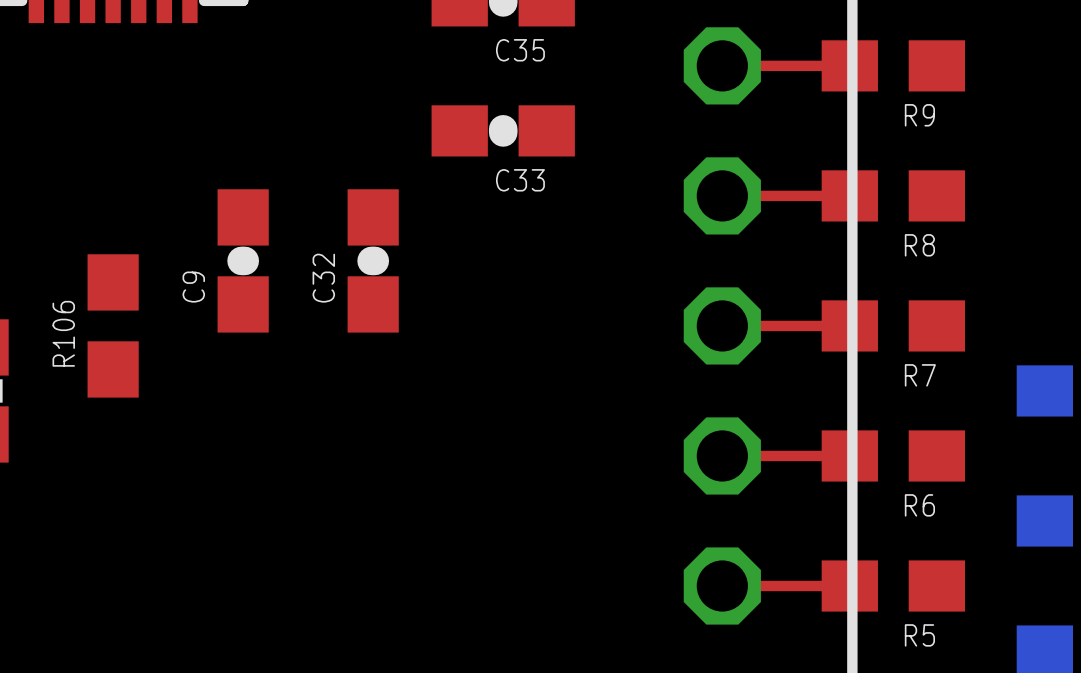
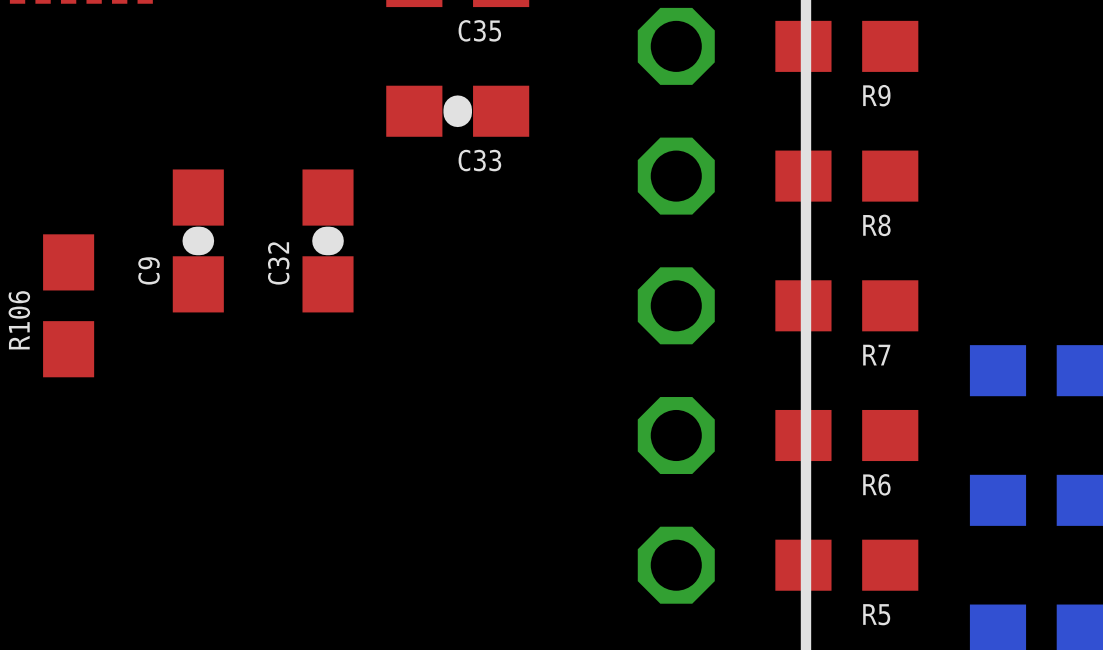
top track: (722, 65) (849, 65) -> none
top track: (722, 195) (849, 195) -> none
top track: (722, 325) (849, 325) -> none
top track: (722, 455) (849, 455) -> none
top track: (722, 586) (849, 586) -> none

